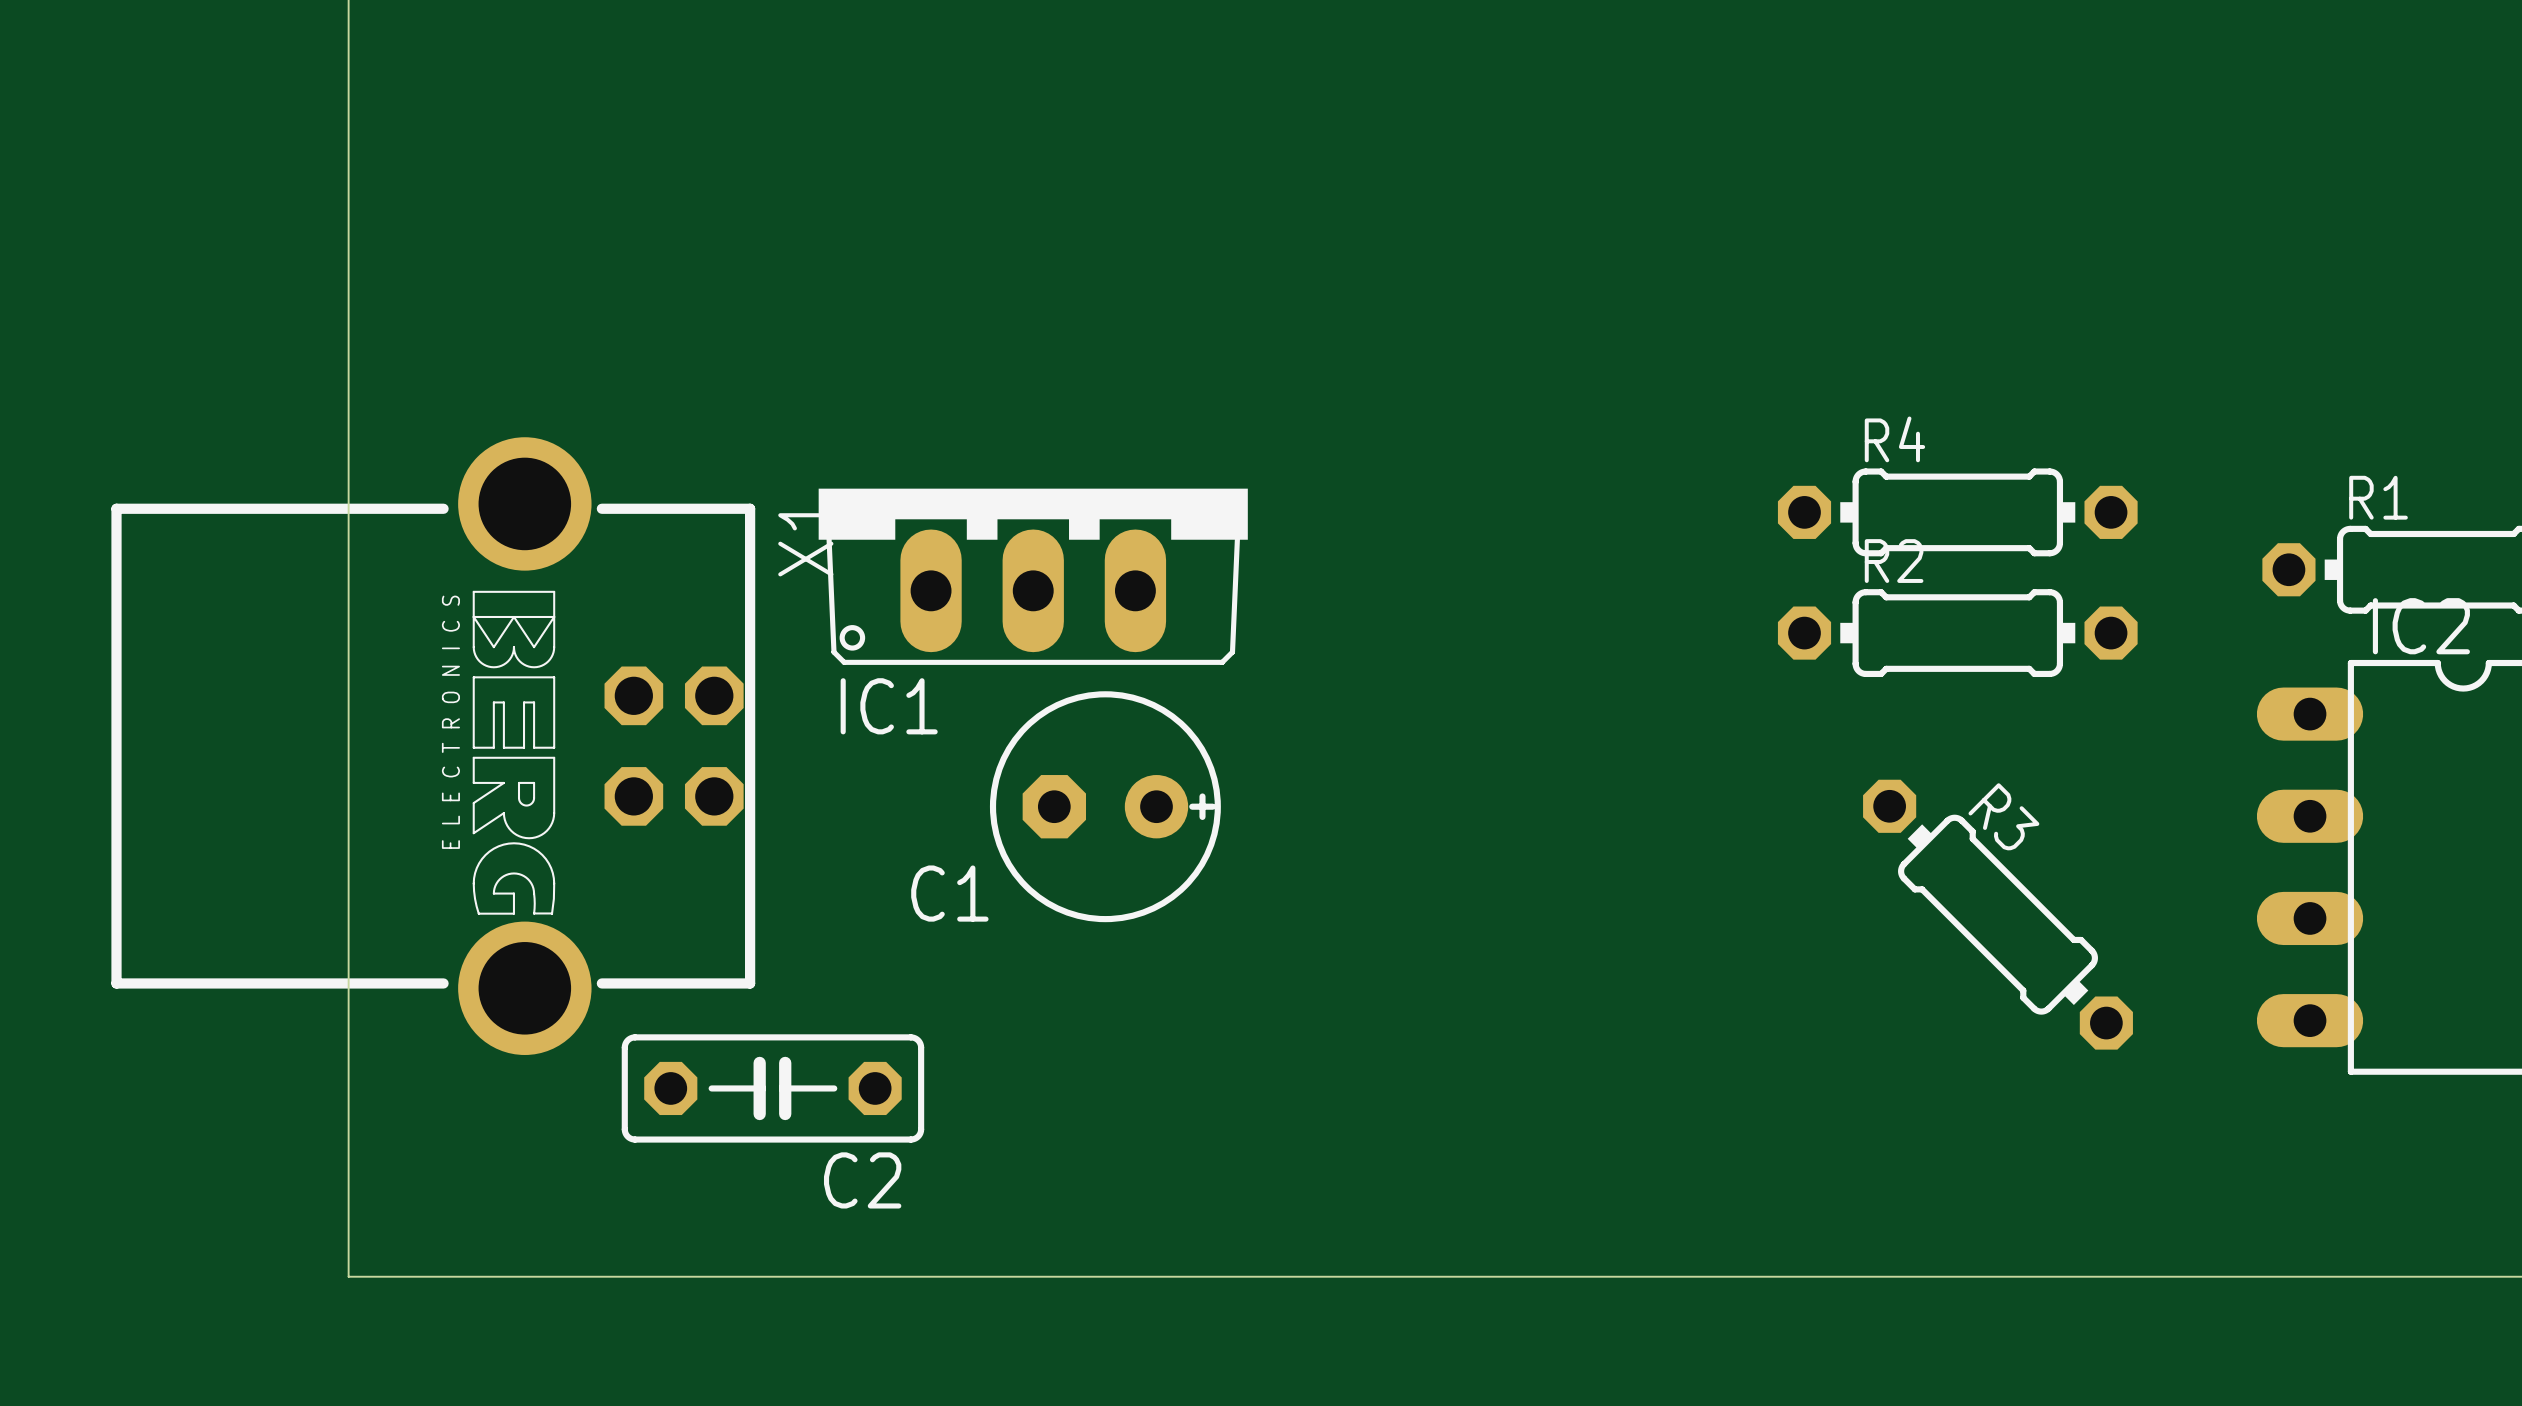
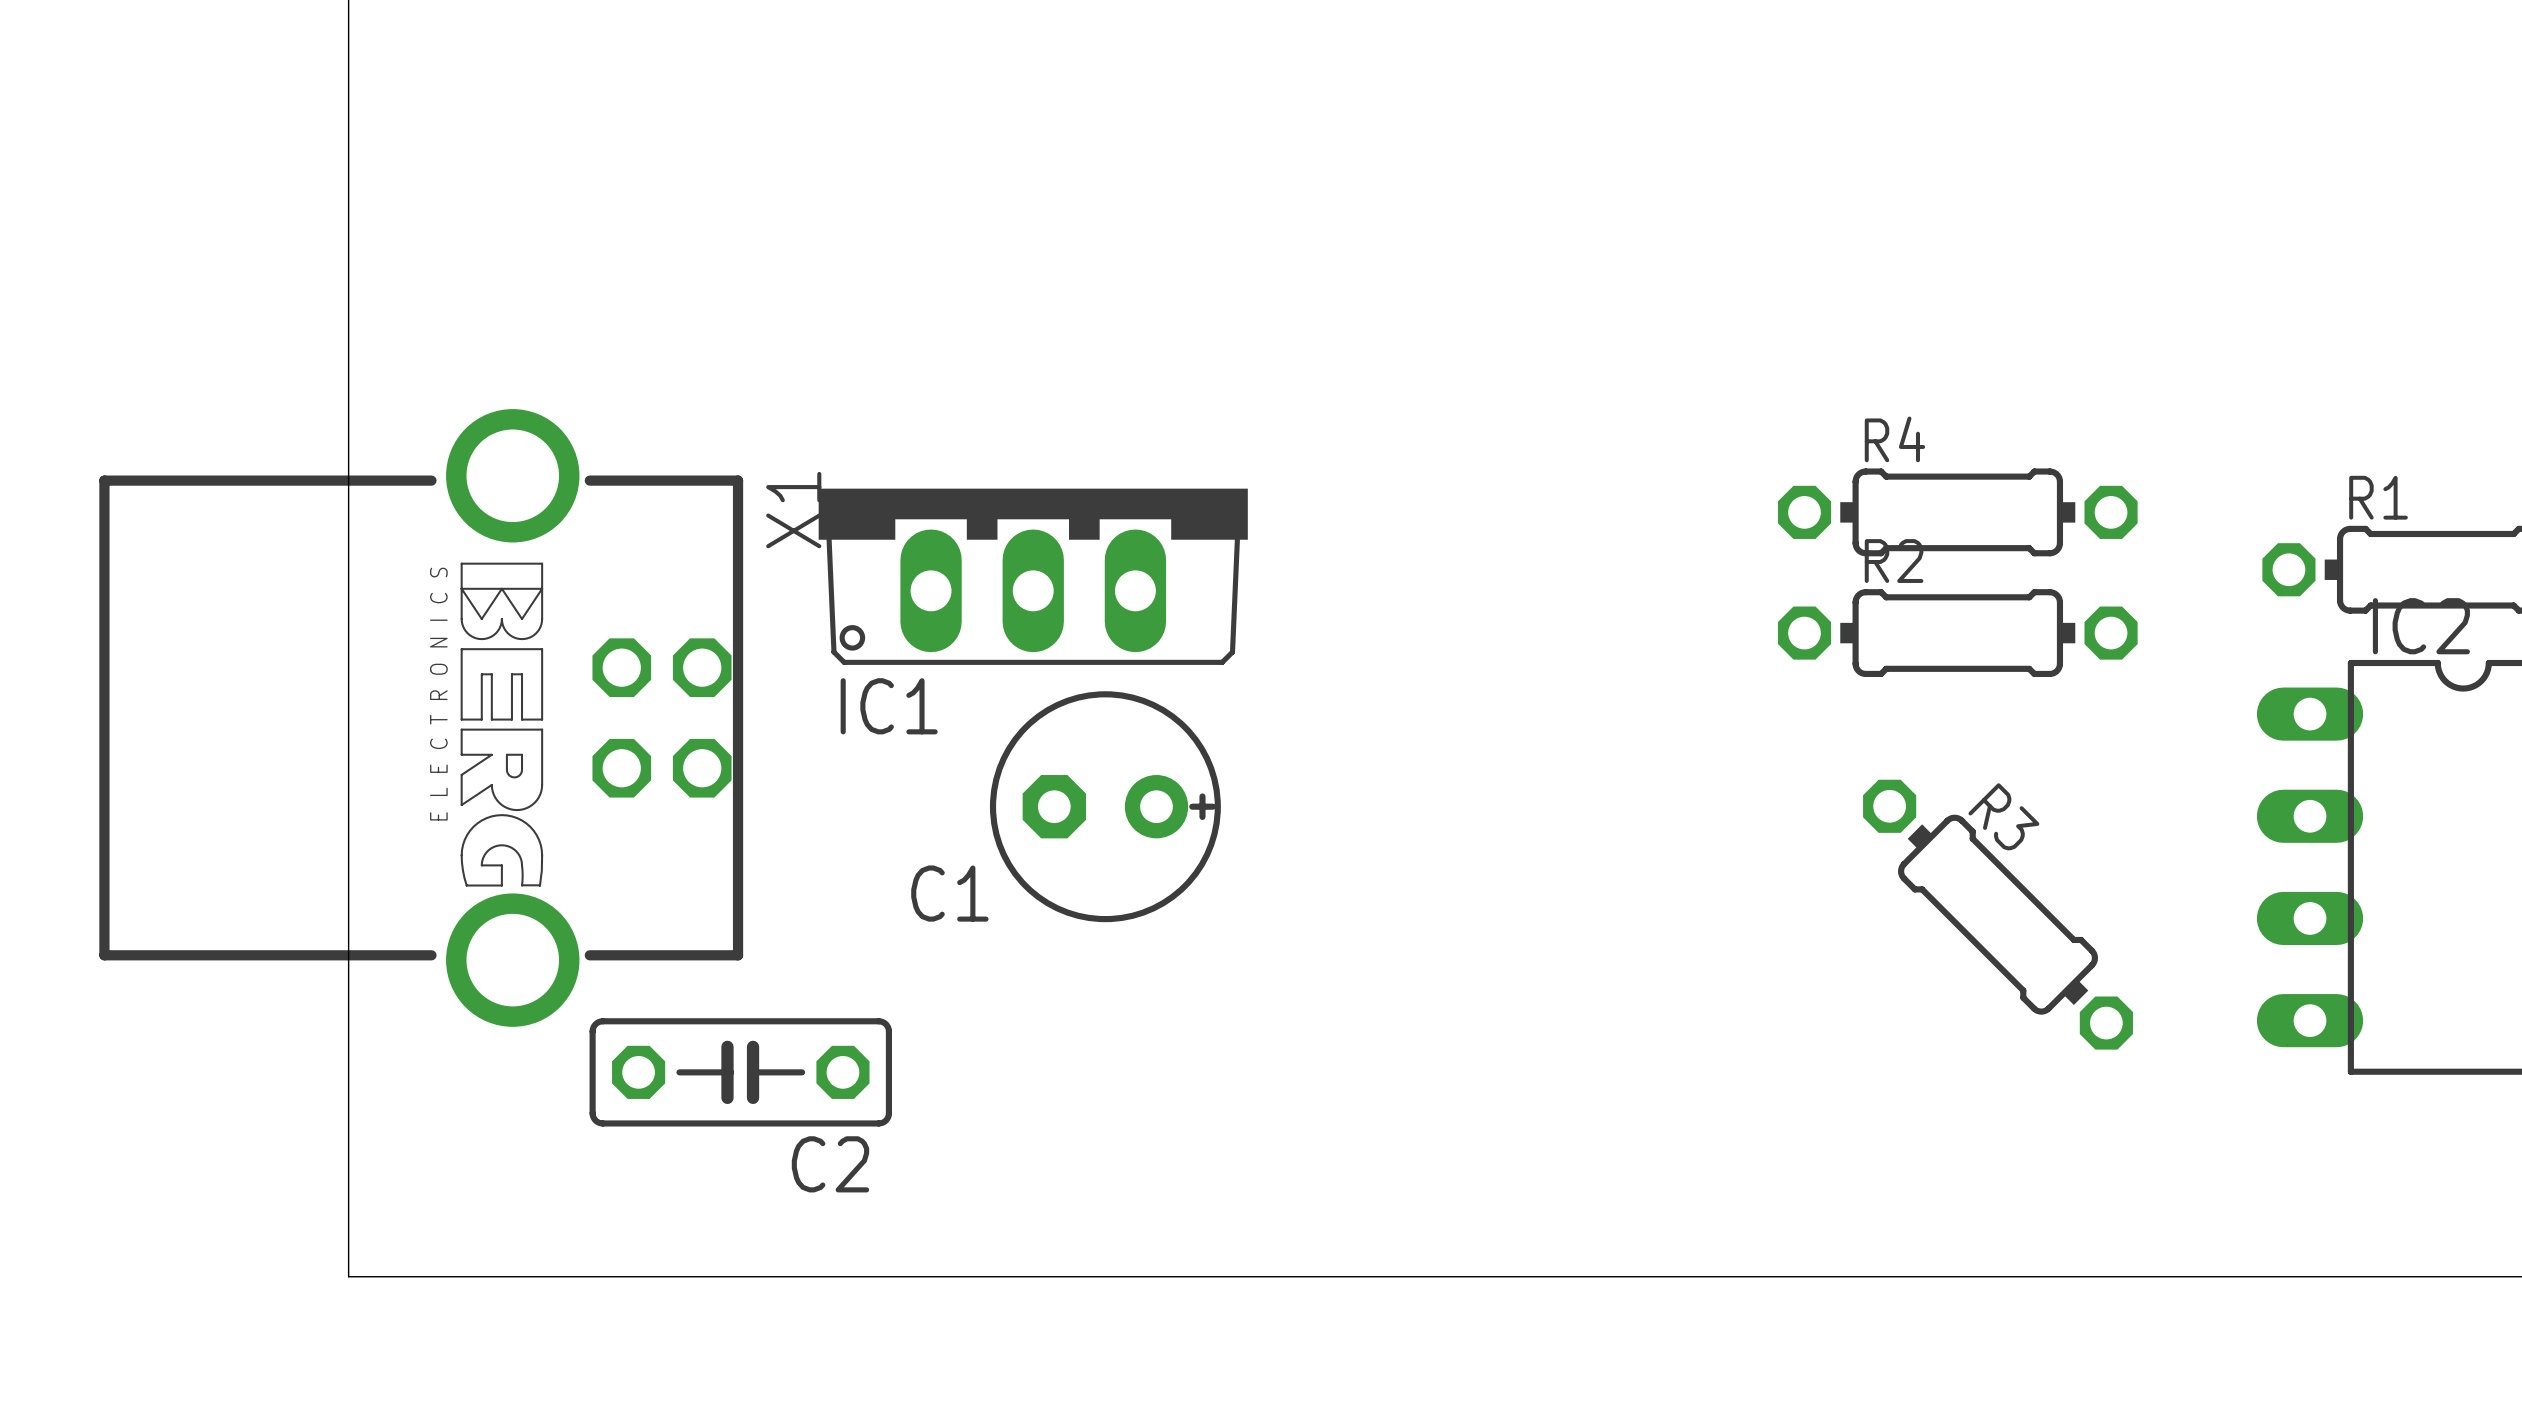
X1 position: (433, 746) -> (421, 717)
C2 position: (772, 1088) -> (740, 1072)

